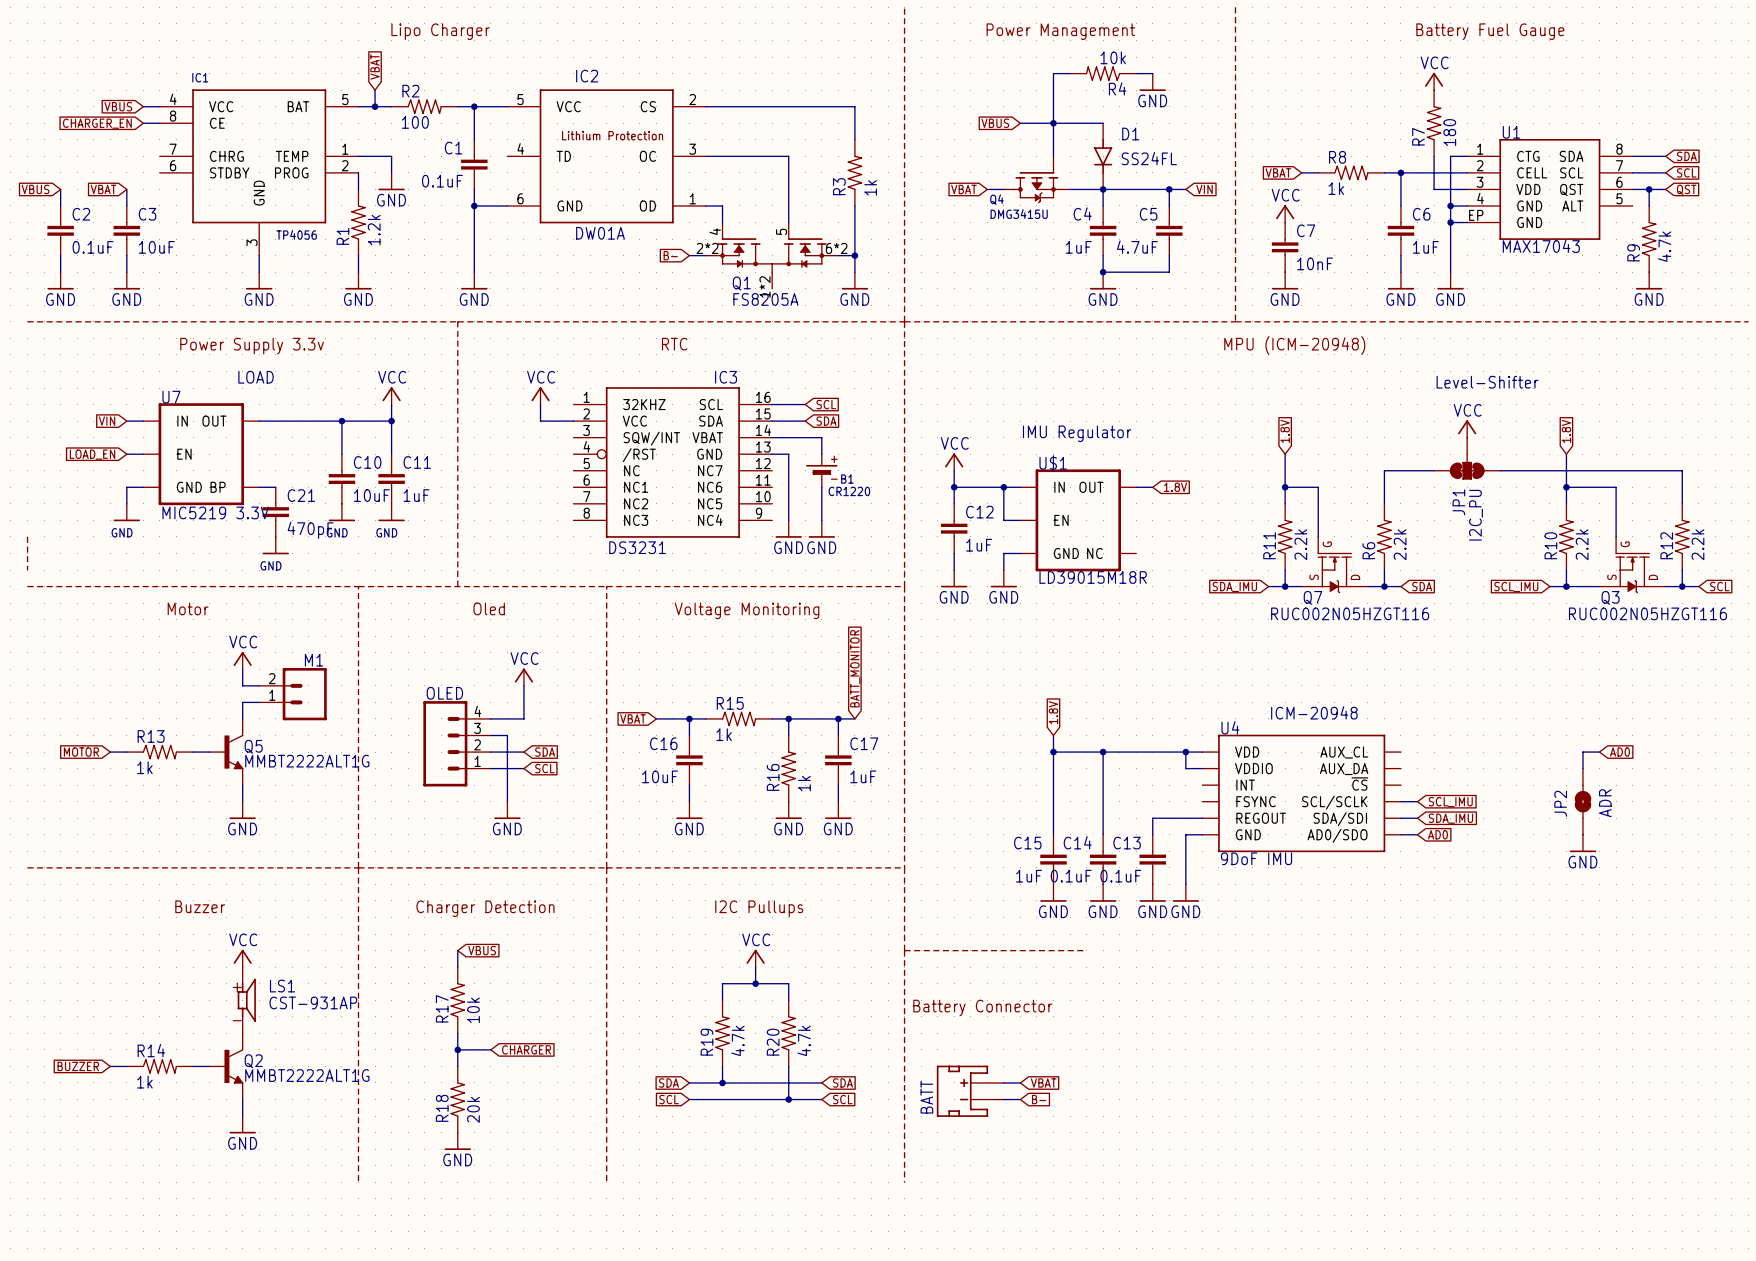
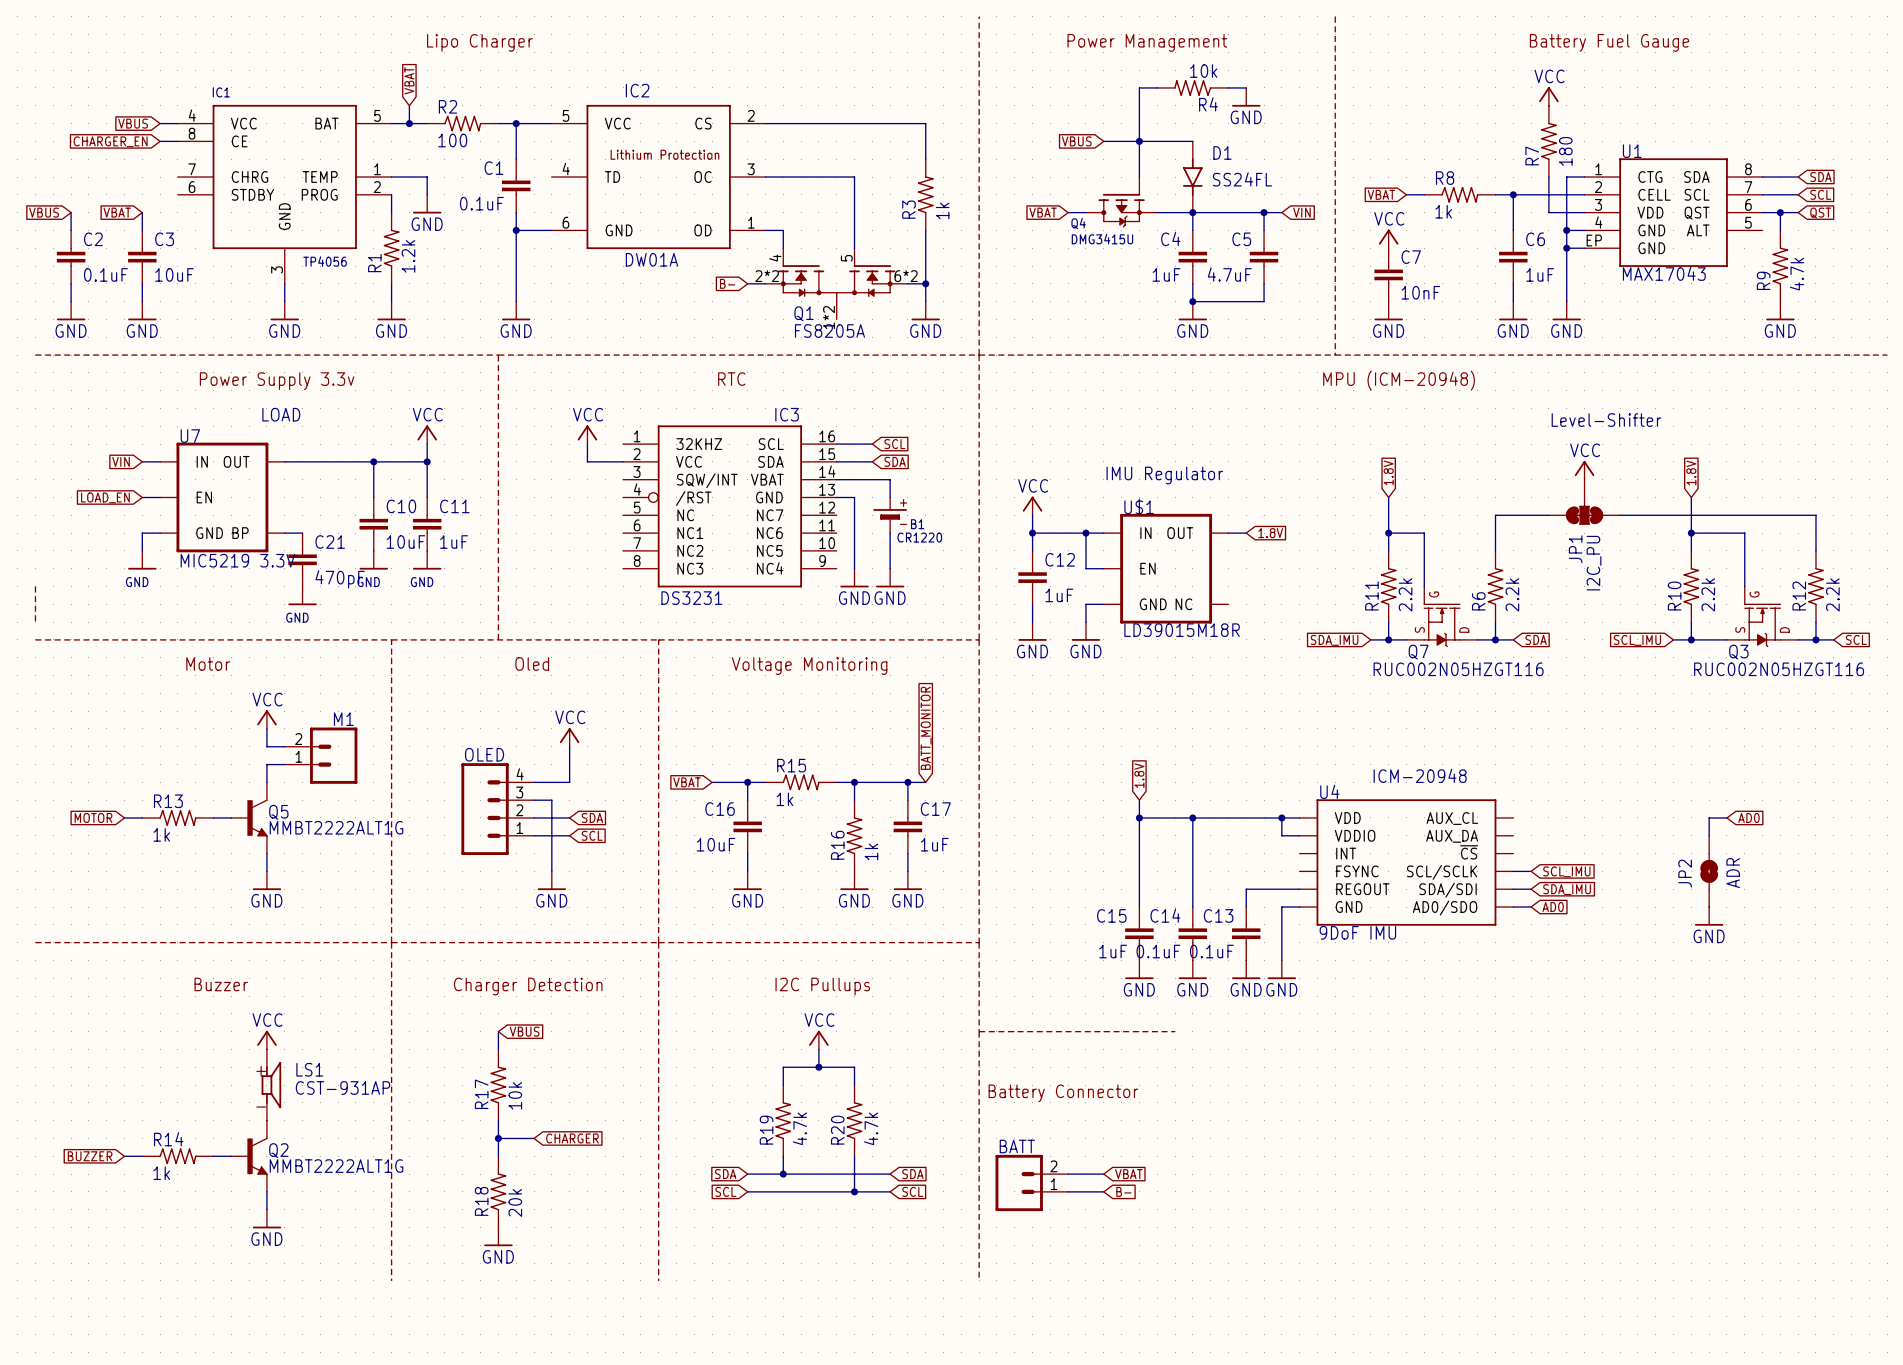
BATT: none -> (1031, 1182)
BATT: (970, 1091) -> none

